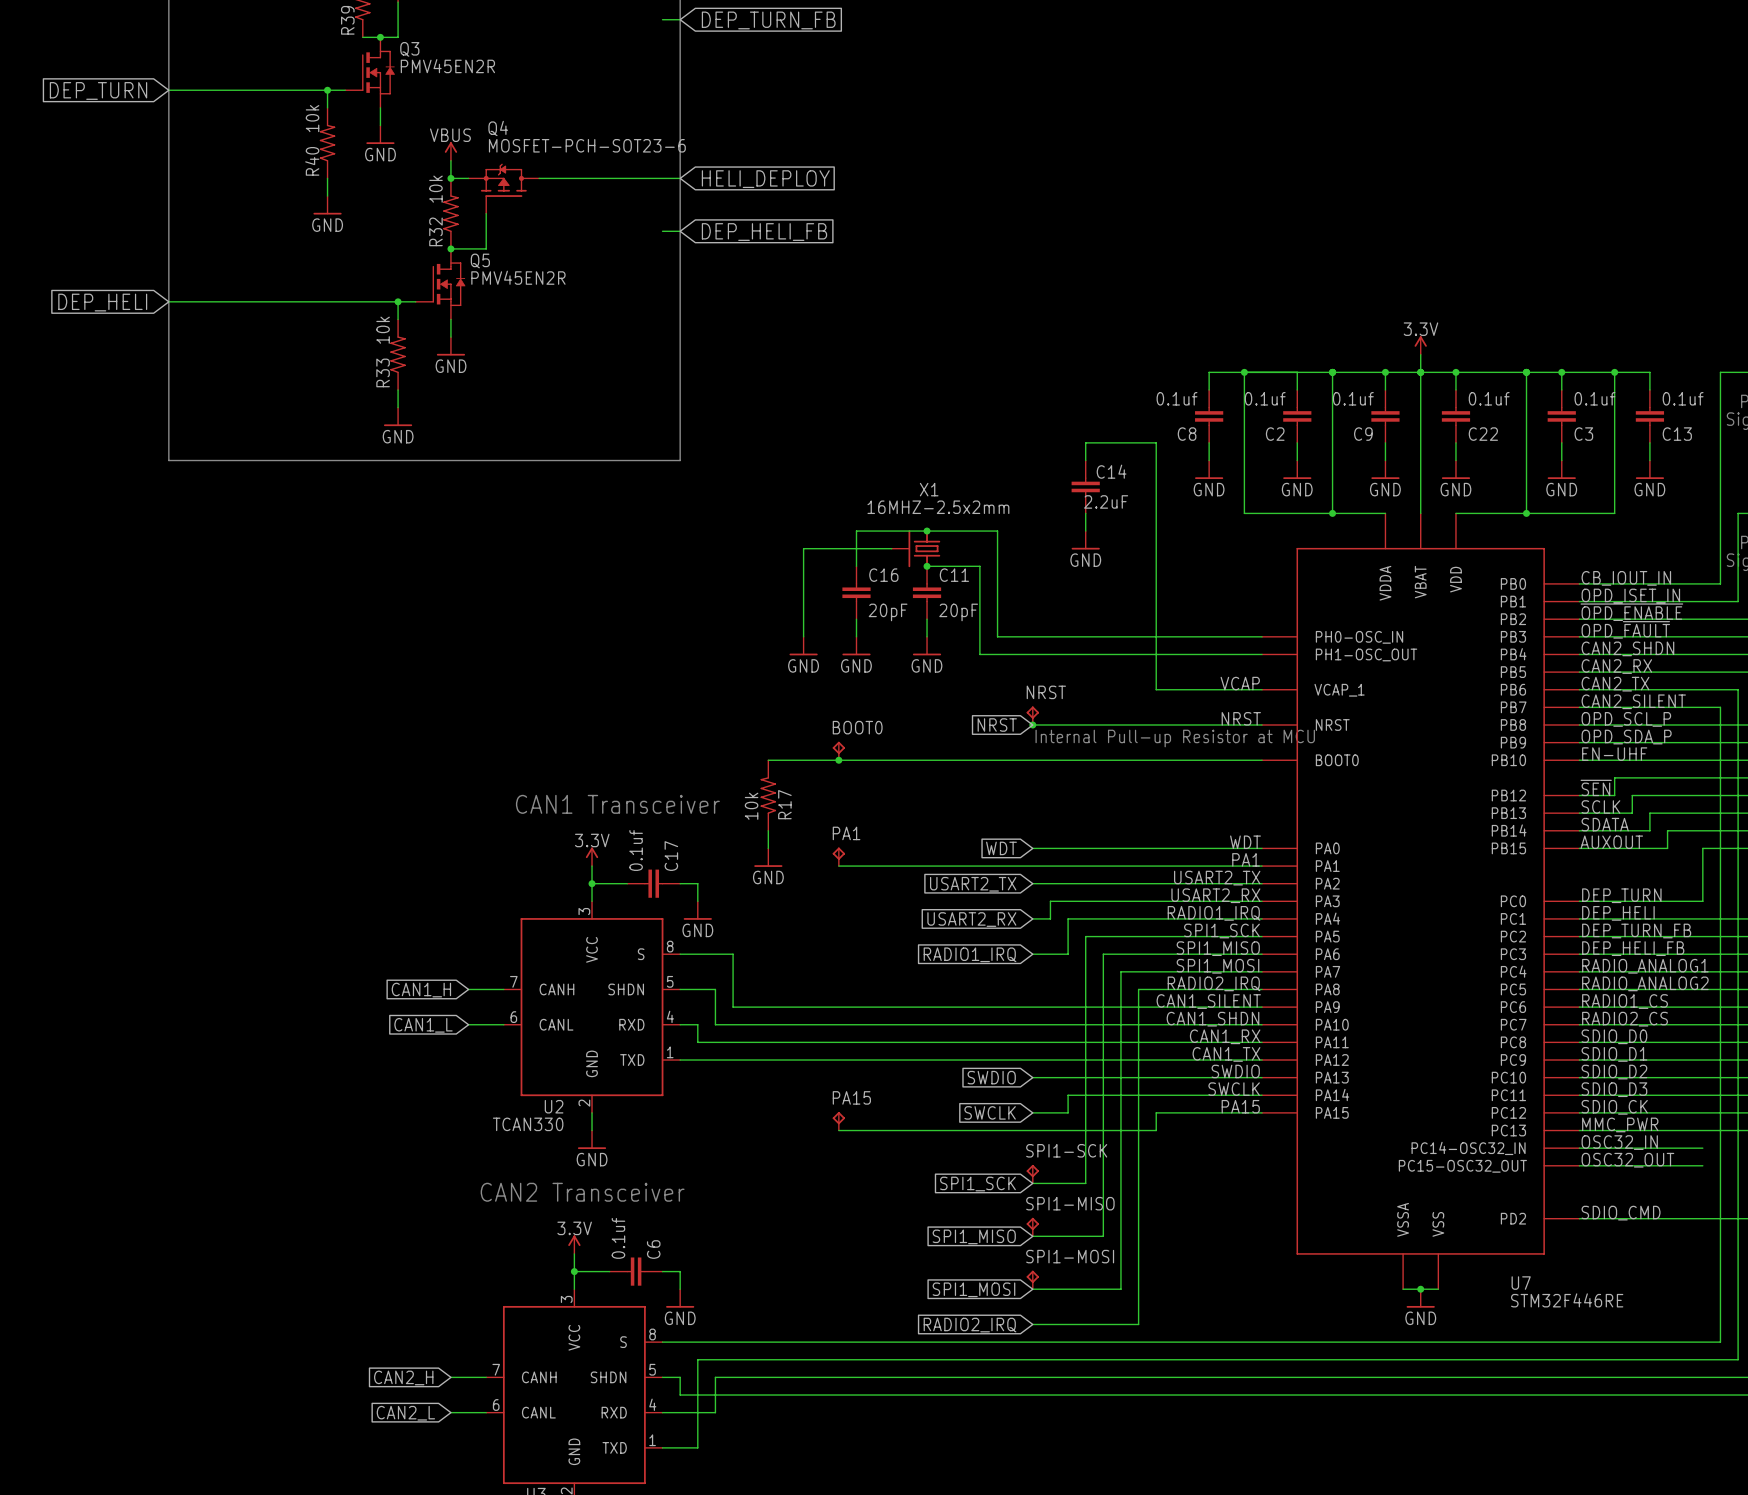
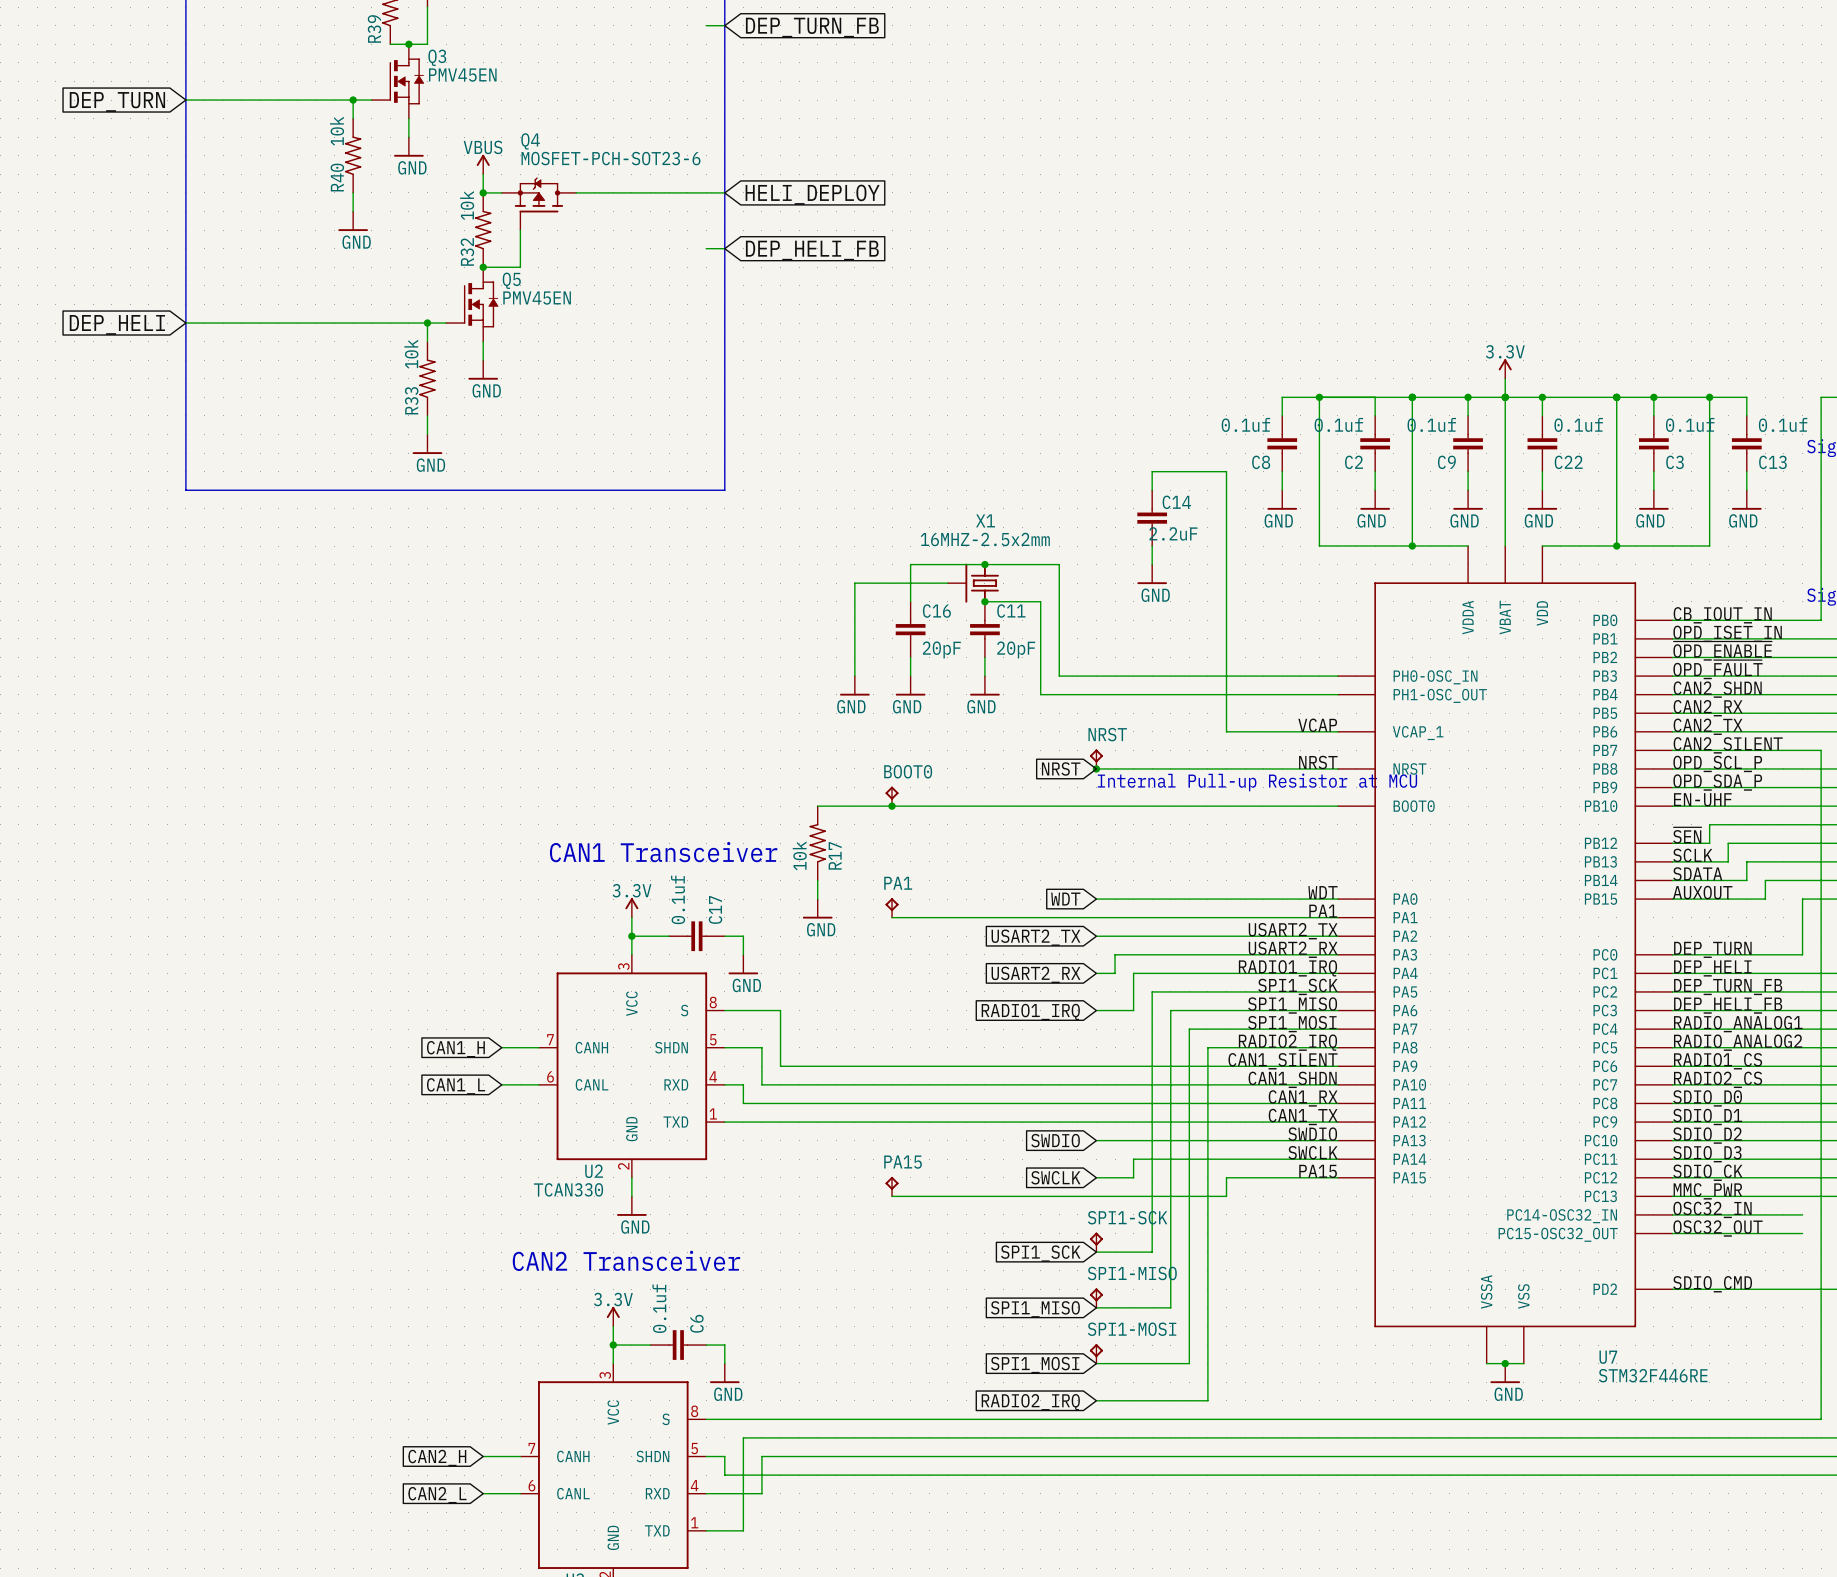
Q3 value: PMV45EN2R (447, 66) -> PMV45EN (462, 75)
Q5 value: PMV45EN2R (518, 277) -> PMV45EN (537, 298)

